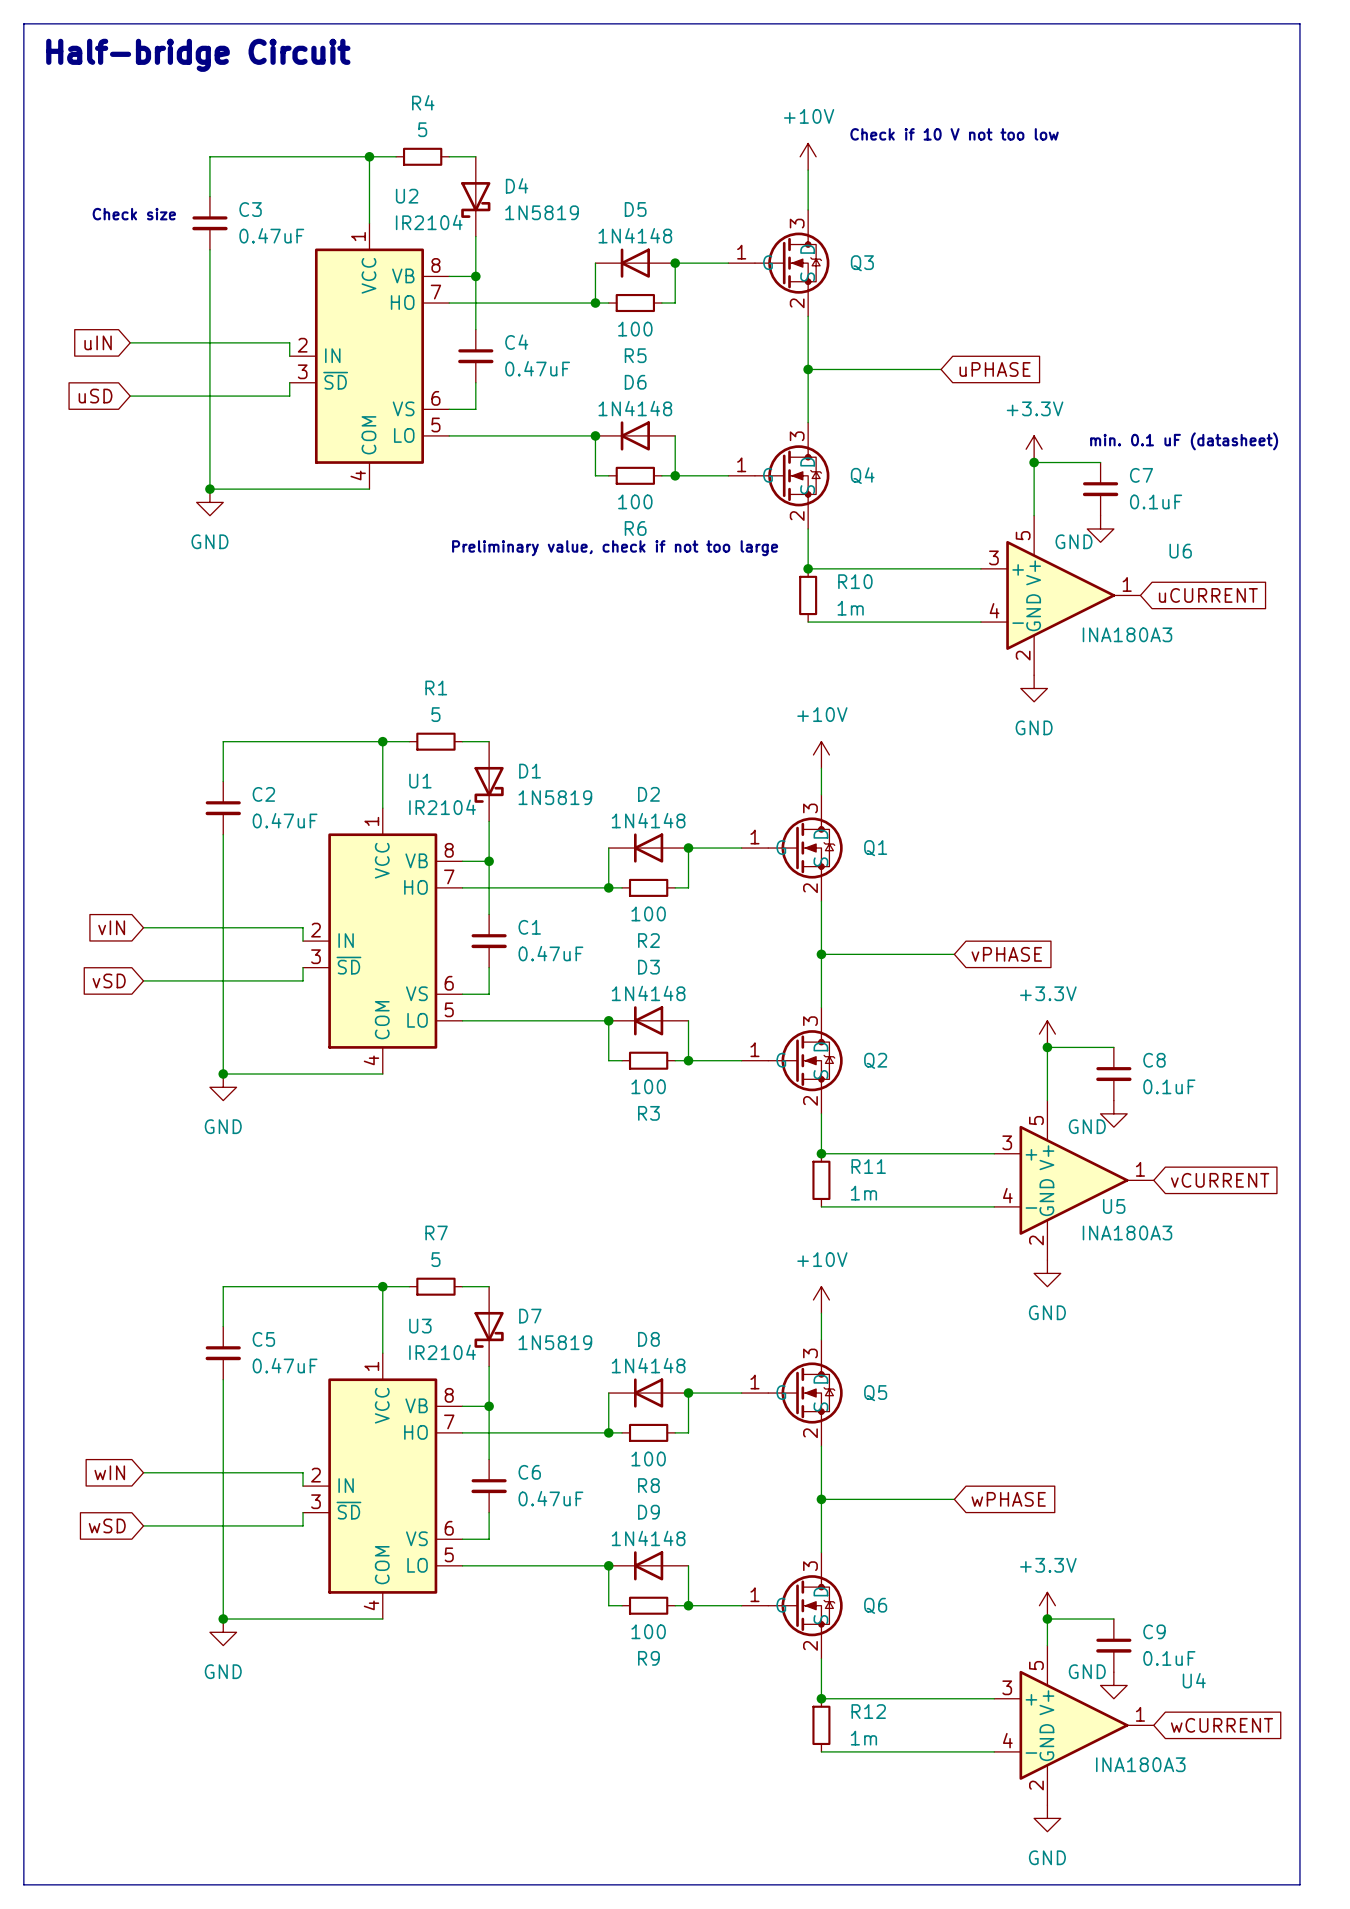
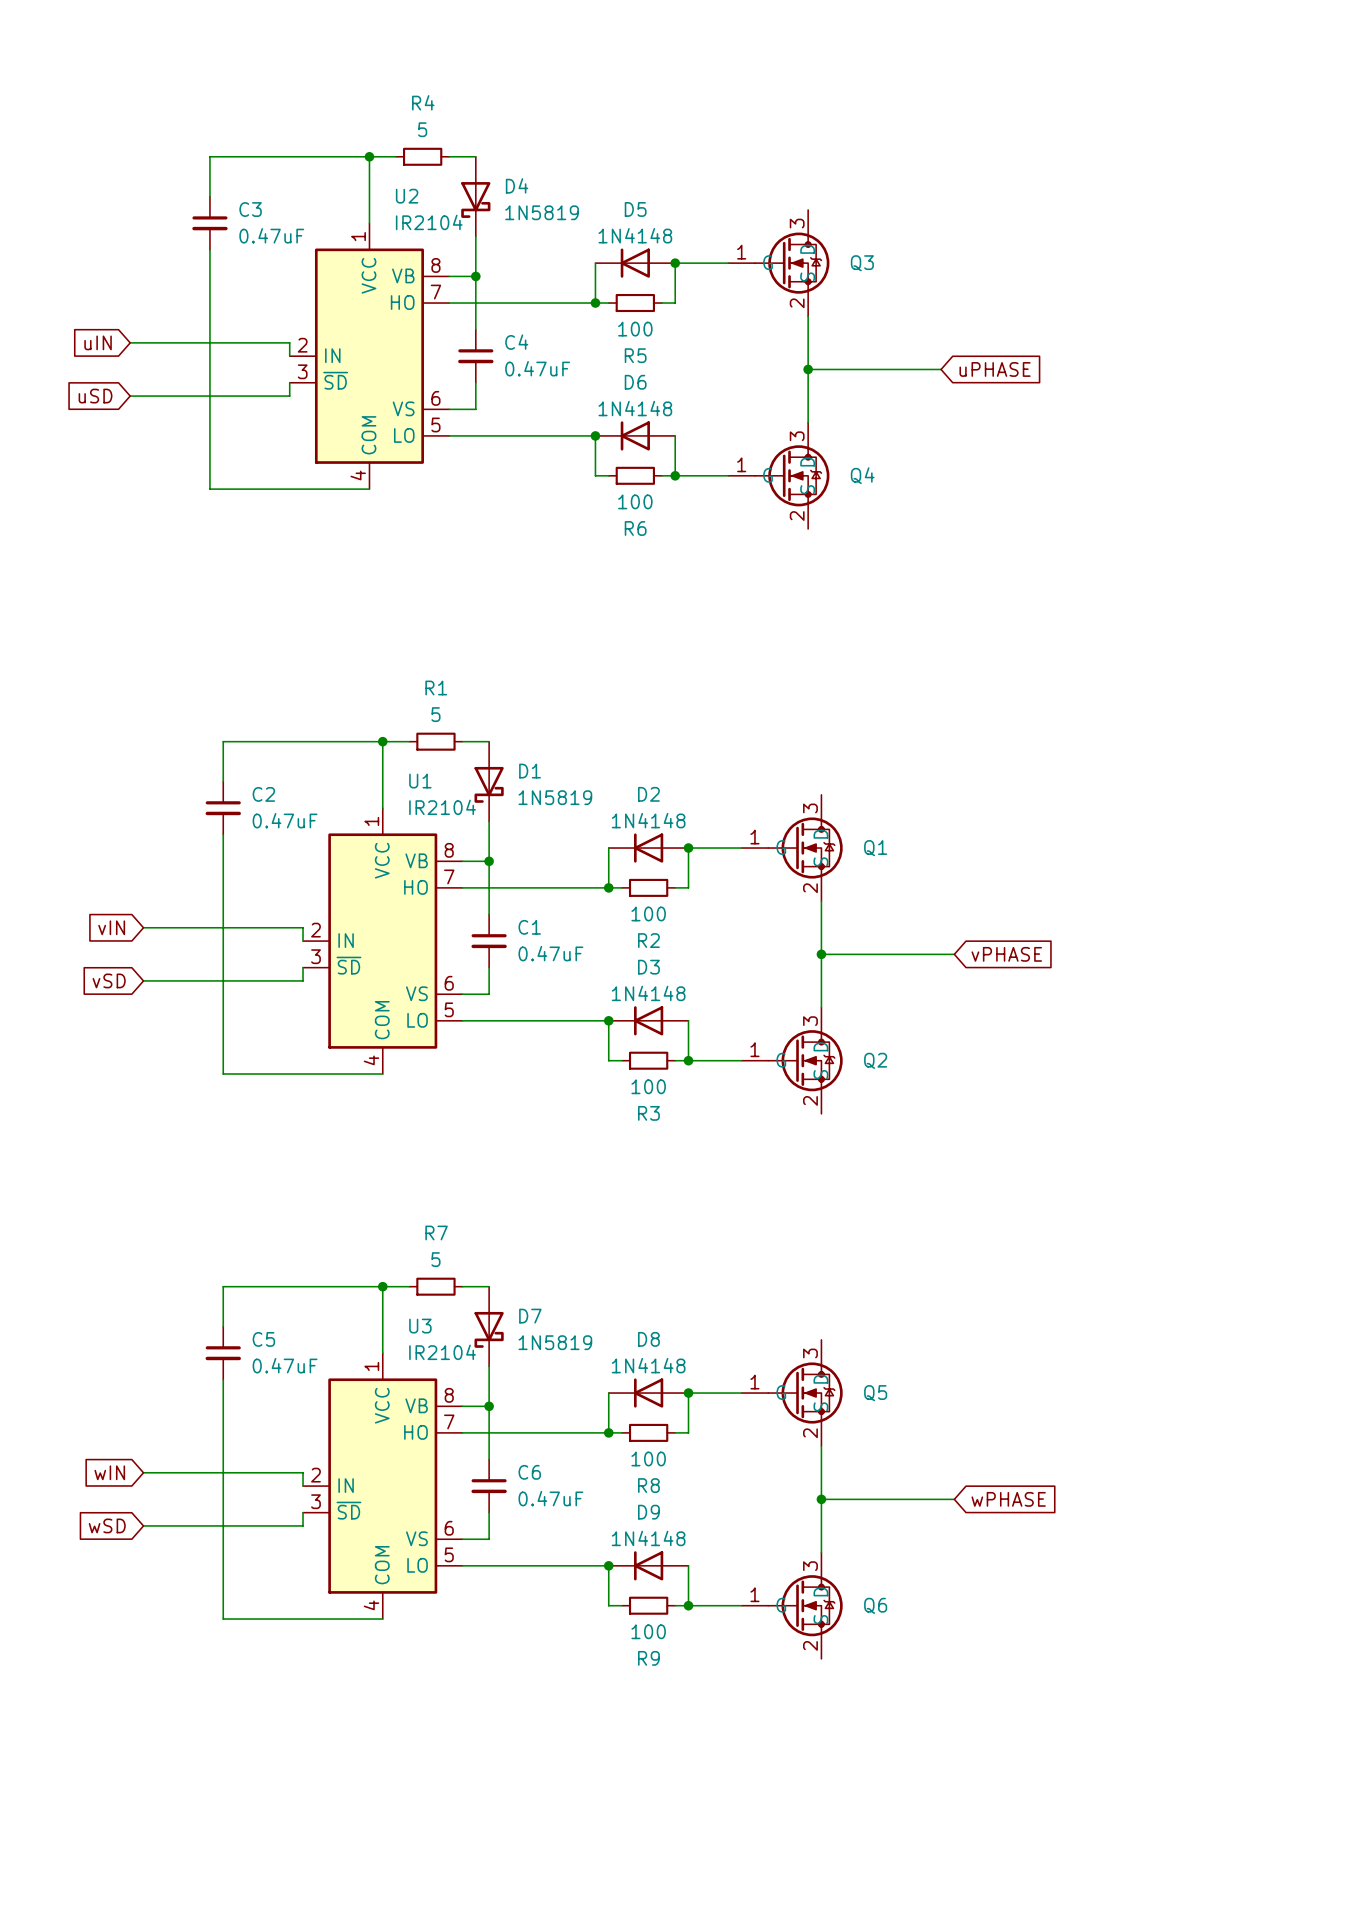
line: (23, 23) (1299, 23) (1299, 1884) (23, 1884) (23, 23) -> none
text: Half-bridge Circuit (198, 55) -> none
text: Check if 10 V not too low (954, 134) -> none
power symbol: +10V (808, 156) -> none
wire: (808, 170) (808, 209) -> none
text: Check size (134, 214) -> none
text: min. 0.1 uF (datasheet) (1184, 441) -> none
power symbol: +3.3V (1034, 449) -> none
junction: (1034, 462) -> none
wire: (1100, 462) (1034, 462) (1034, 515) -> none
junction: (209, 489) -> none
C7: 0.1uF (1100, 489) -> none
power symbol: GND (209, 502) -> none
wire: (808, 528) (808, 568) (980, 568) -> none
power symbol: GND (1100, 528) -> none
text: Preliminary value, check if not too large (615, 548) -> none
junction: (808, 568) -> none
R10: 1m (808, 595) -> none
U6: INA180A3 (1060, 595) -> none
global label: uCURRENT (1208, 595) -> none
wire: (808, 622) (980, 622) -> none
power symbol: GND (1034, 688) -> none
power symbol: +10V (821, 754) -> none
wire: (821, 768) (821, 794) -> none
power symbol: +3.3V (1047, 1034) -> none
junction: (1047, 1047) -> none
wire: (1113, 1047) (1047, 1047) (1047, 1100) -> none
junction: (223, 1074) -> none
C8: 0.1uF (1113, 1074) -> none
power symbol: GND (223, 1087) -> none
wire: (821, 1113) (821, 1153) (994, 1153) -> none
power symbol: GND (1113, 1113) -> none
junction: (821, 1153) -> none
R11: 1m (821, 1180) -> none
U5: INA180A3 (1074, 1180) -> none
global label: vCURRENT (1220, 1180) -> none
wire: (821, 1206) (994, 1206) -> none
power symbol: GND (1047, 1273) -> none
power symbol: +10V (821, 1299) -> none
wire: (821, 1313) (821, 1339) -> none
power symbol: +3.3V (1047, 1605) -> none
junction: (223, 1619) -> none
junction: (1047, 1619) -> none
wire: (1113, 1619) (1047, 1619) (1047, 1645) -> none
power symbol: GND (223, 1632) -> none
C9: 0.1uF (1113, 1645) -> none
wire: (821, 1658) (821, 1698) (994, 1698) -> none
power symbol: GND (1113, 1685) -> none
junction: (821, 1698) -> none
R12: 1m (821, 1725) -> none
U4: INA180A3 (1074, 1725) -> none
global label: wCURRENT (1221, 1725) -> none
wire: (821, 1751) (994, 1751) -> none
power symbol: GND (1047, 1818) -> none

